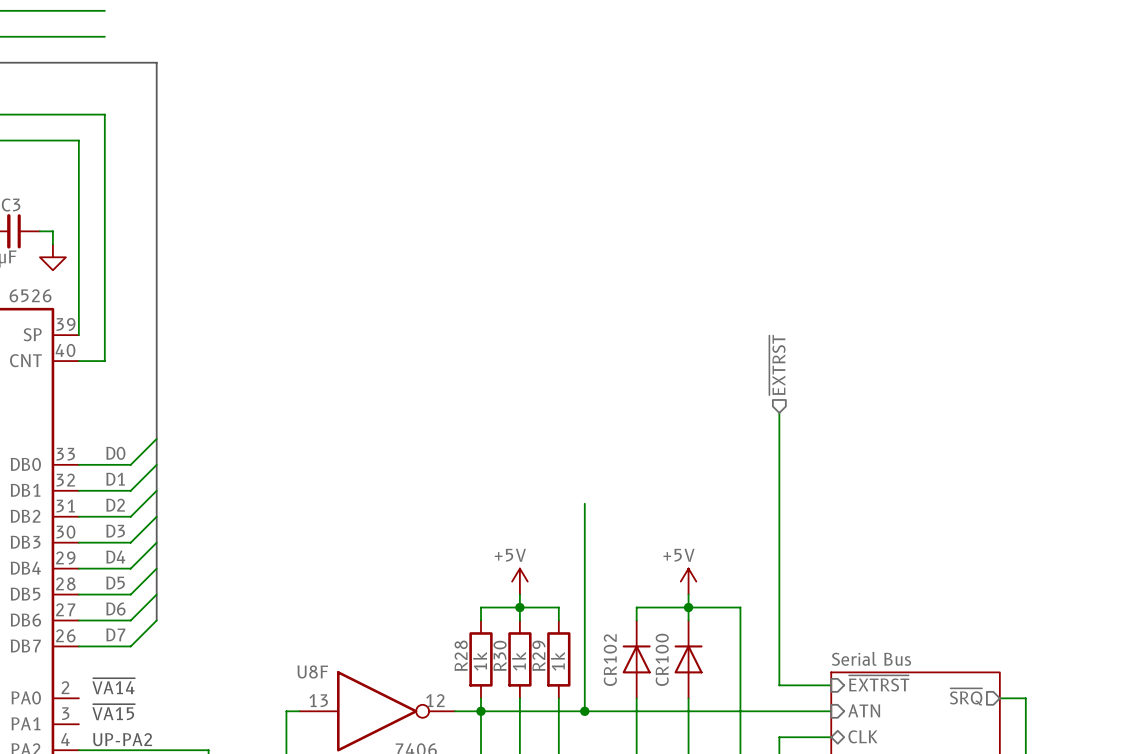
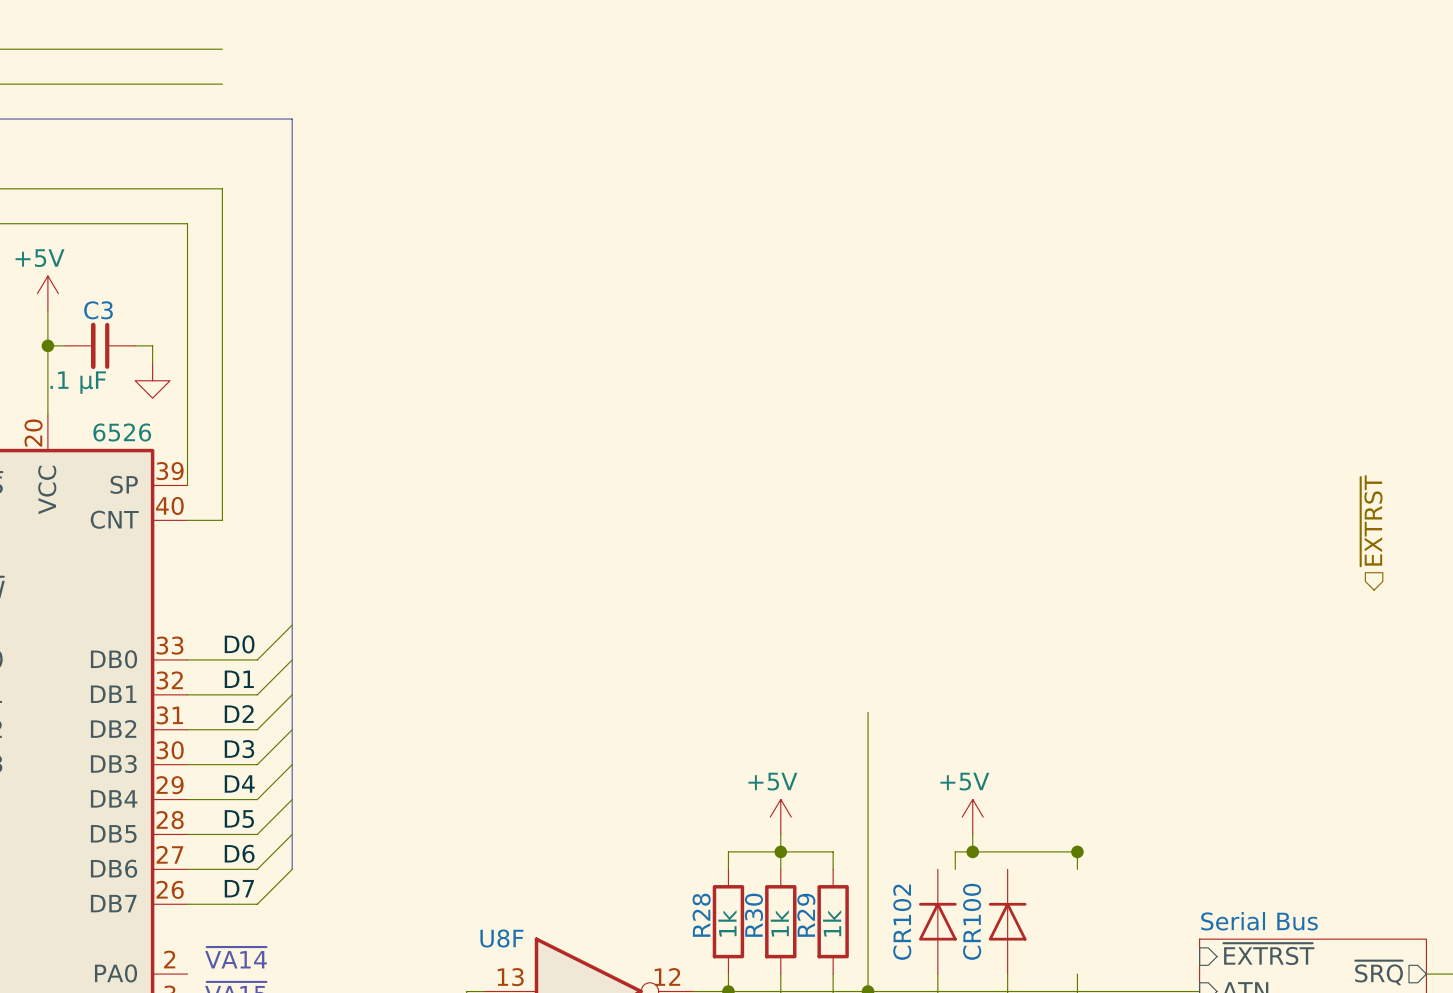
hierarchical label position: ~{EXTRST} (777, 365) -> ~{EXTRST} (1371, 520)
wire: (779, 412) (779, 685) (831, 685) -> none
power symbol position: +5V (688, 581) -> +5V (972, 817)
wire: none -> (972, 834) (972, 851)
wire: (688, 594) (688, 620) -> none
wire: (649, 607) (636, 607) (636, 620) -> (955, 851) (955, 869)
junction: none -> (972, 851)
junction: (688, 607) -> none
junction: none -> (1077, 851)
wire: (740, 620) (740, 698) -> none

